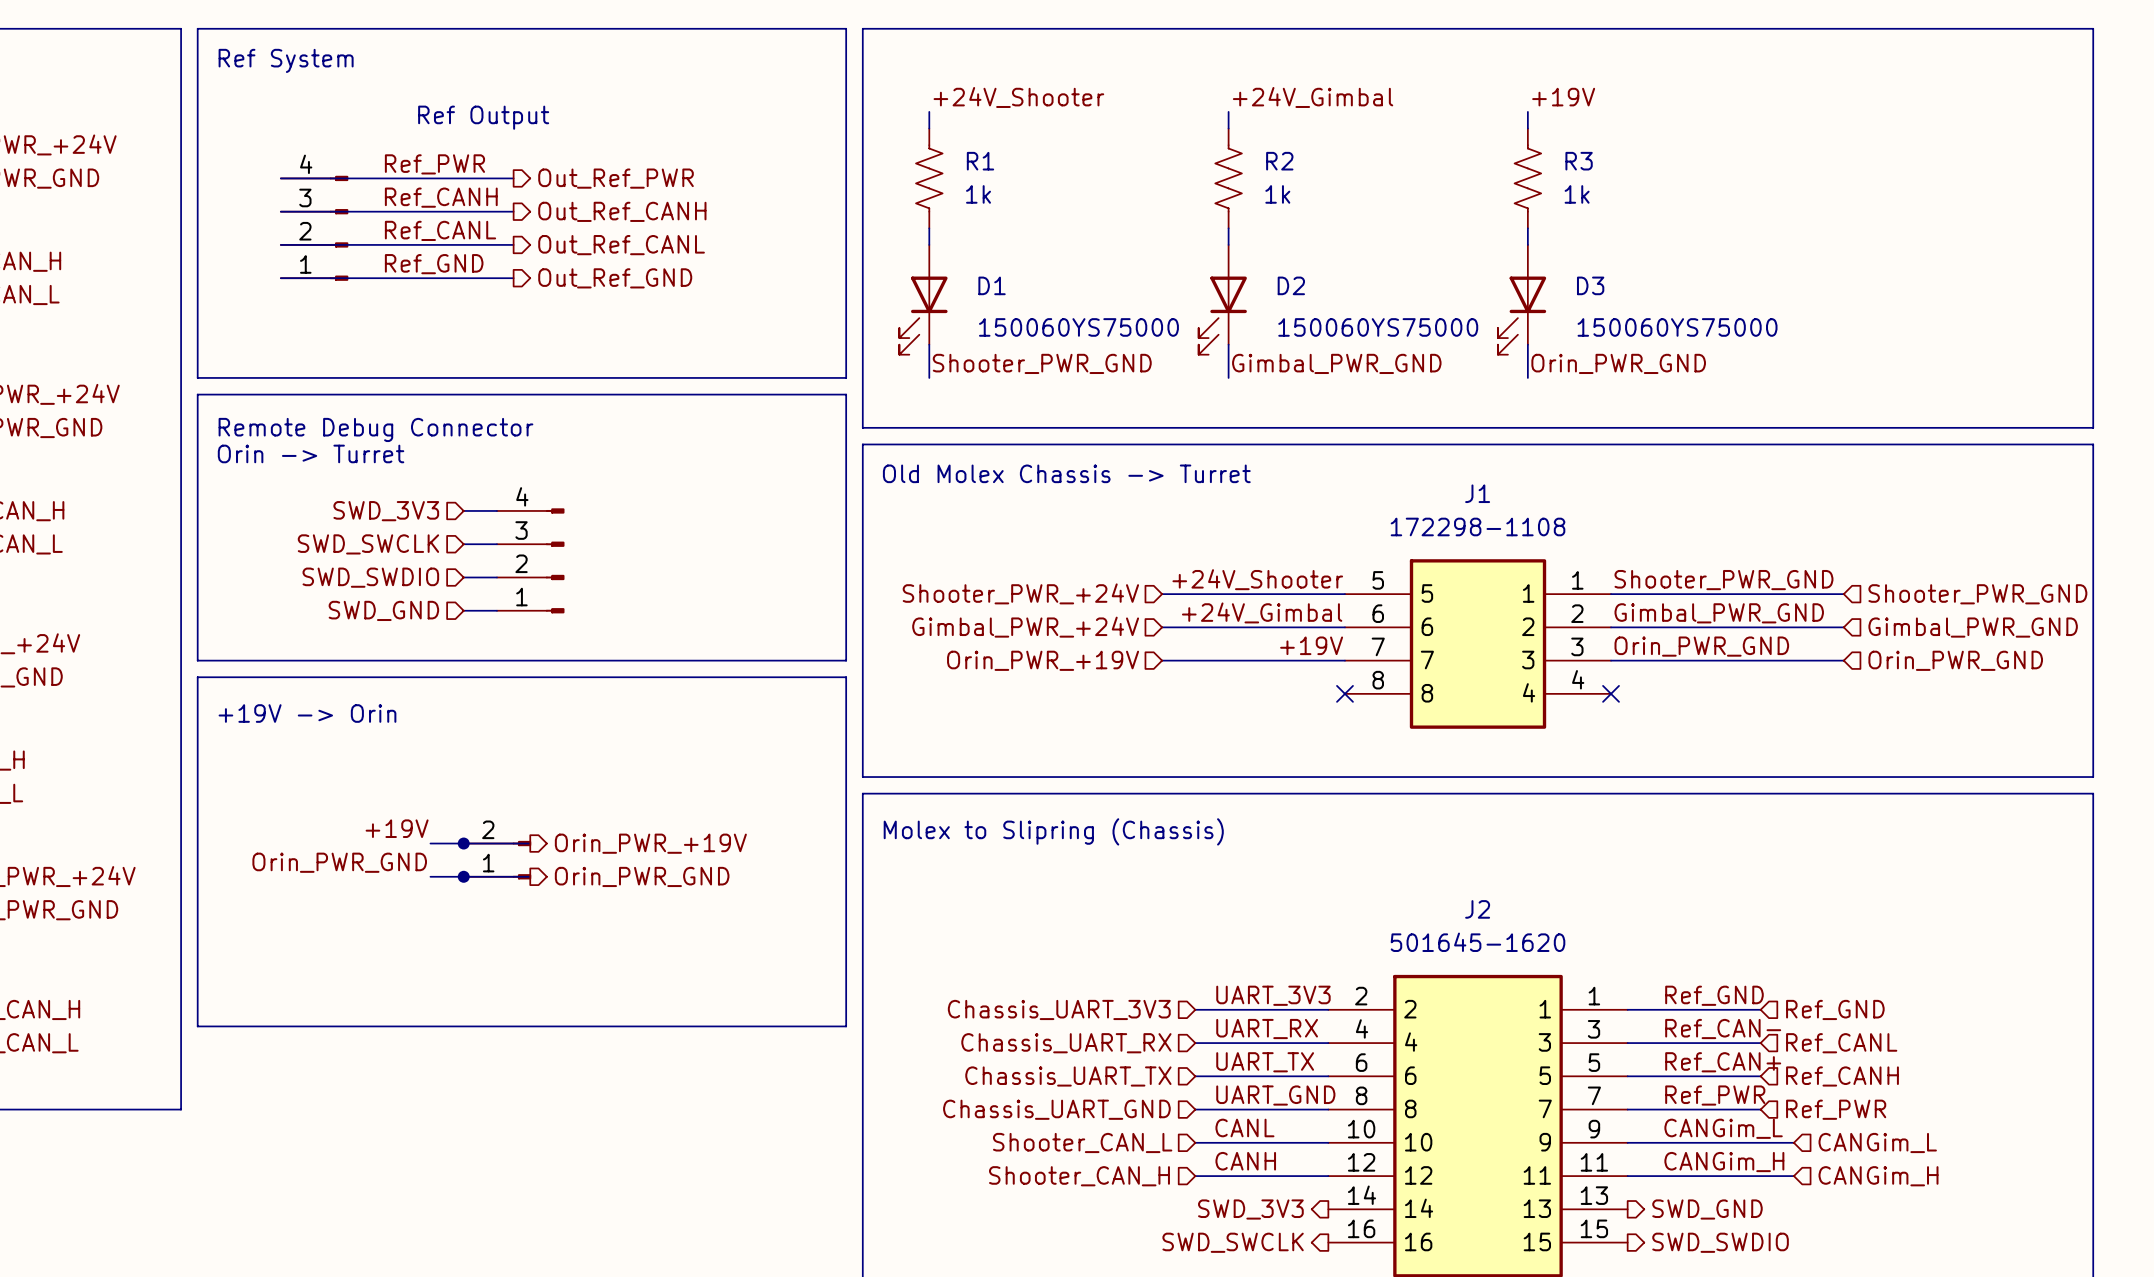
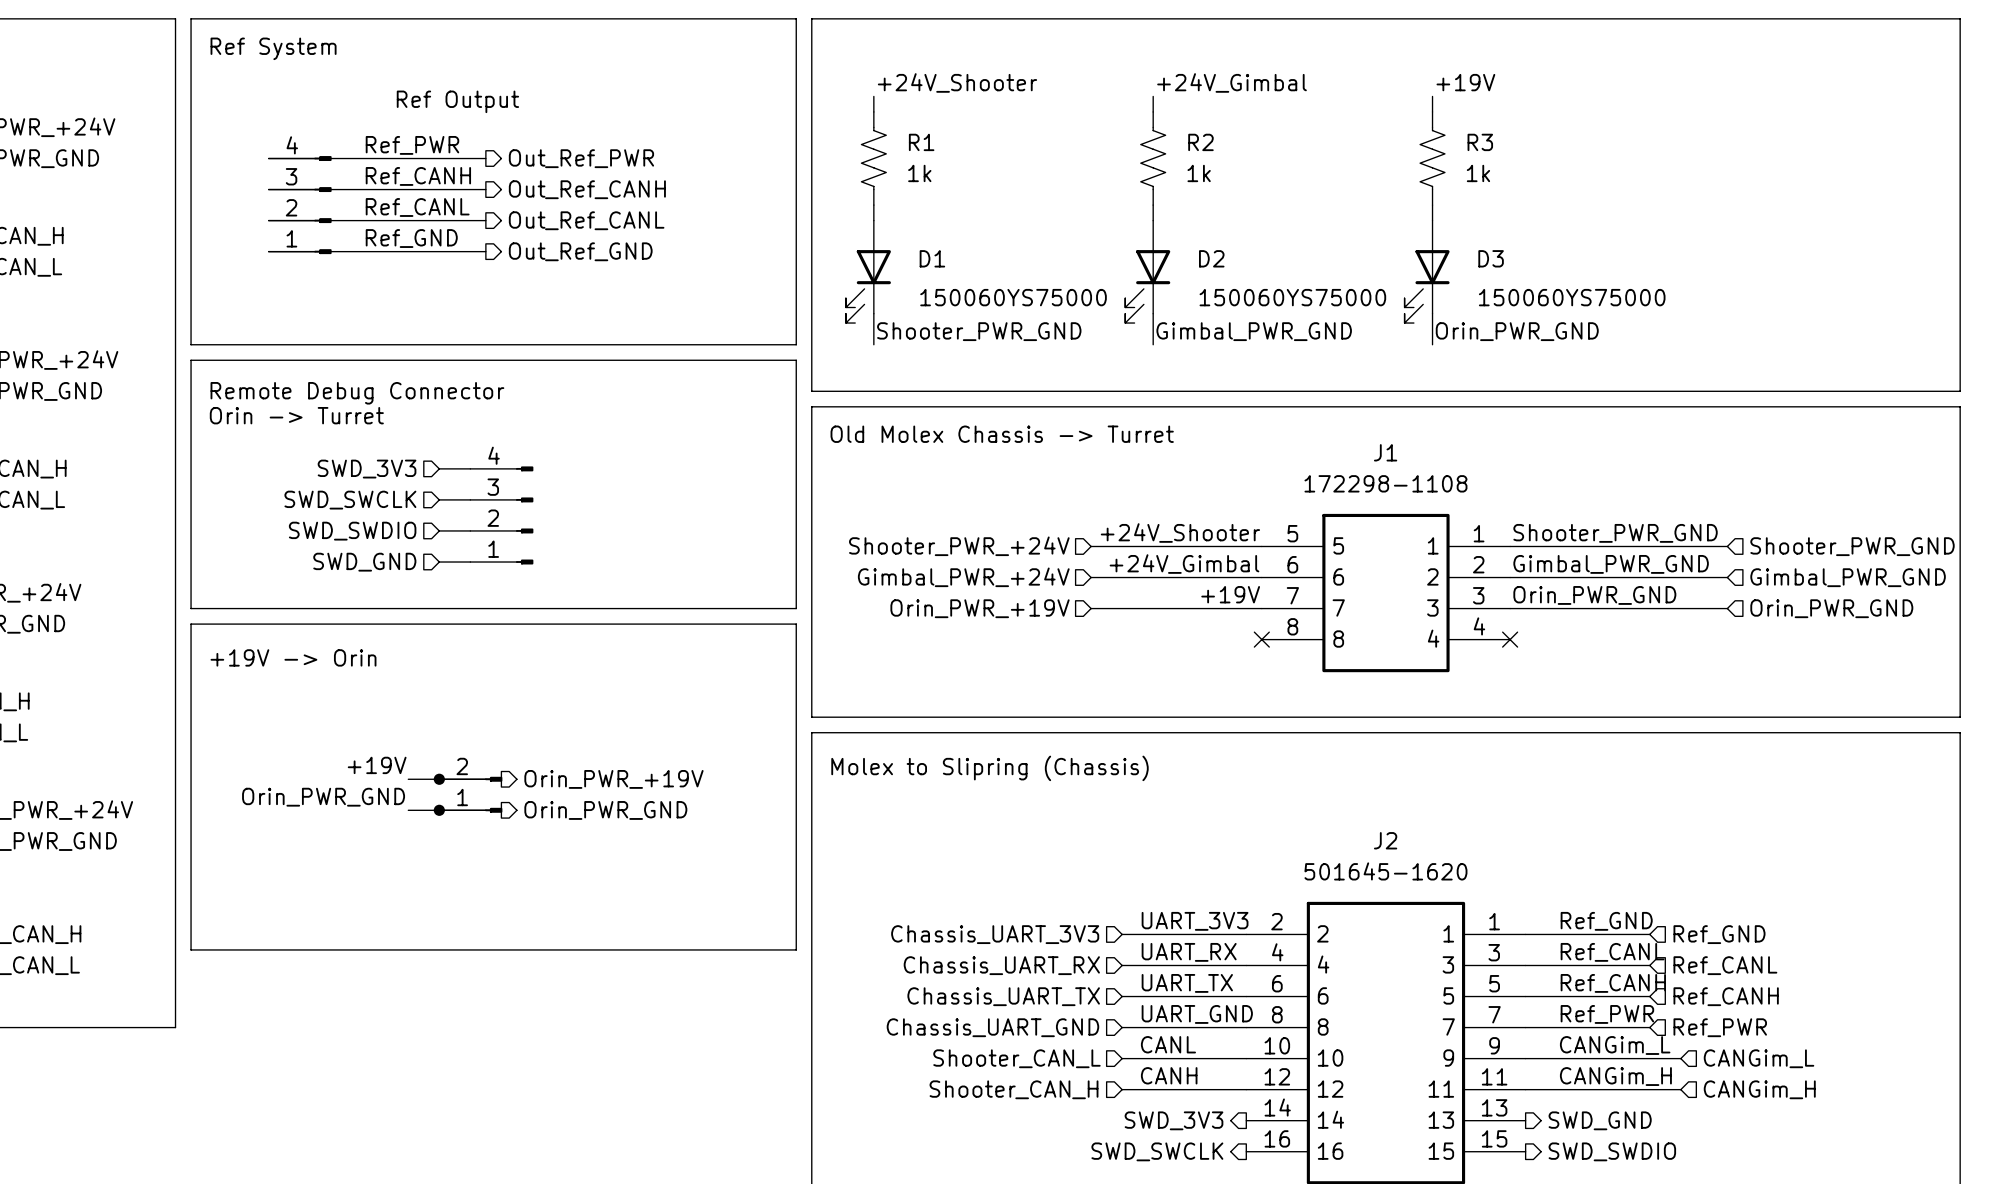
label: Ref_CAN- (1723, 1029) -> Ref_CANL (1612, 952)
label: Ref_CAN+ (1723, 1062) -> Ref_CANH (1613, 983)

